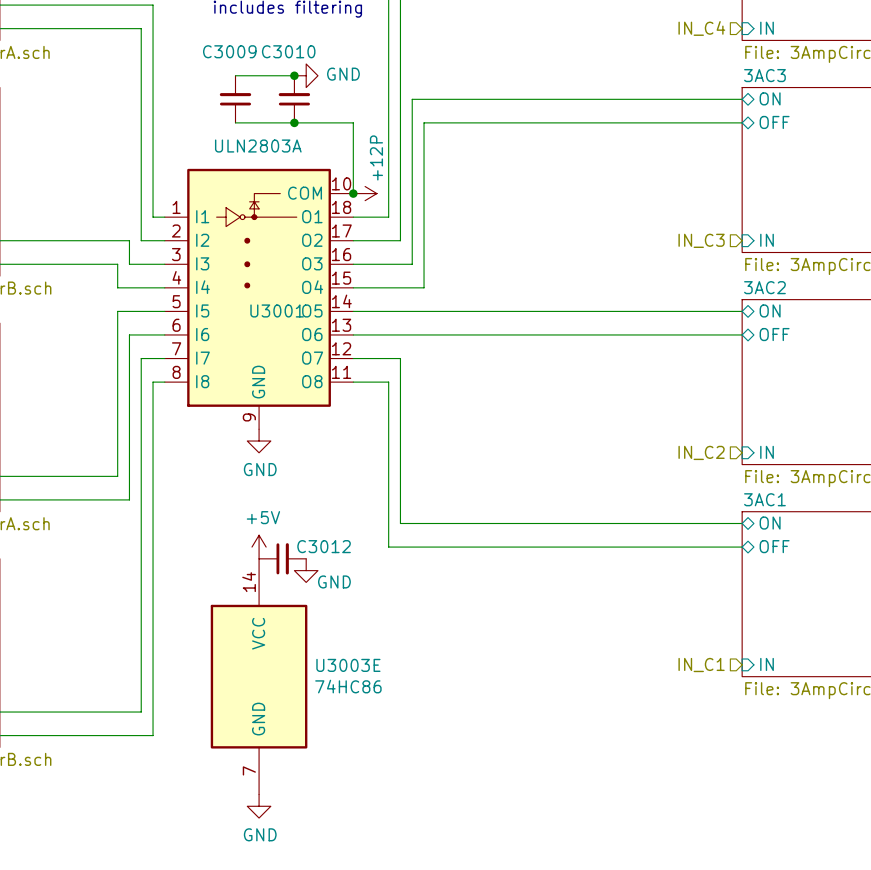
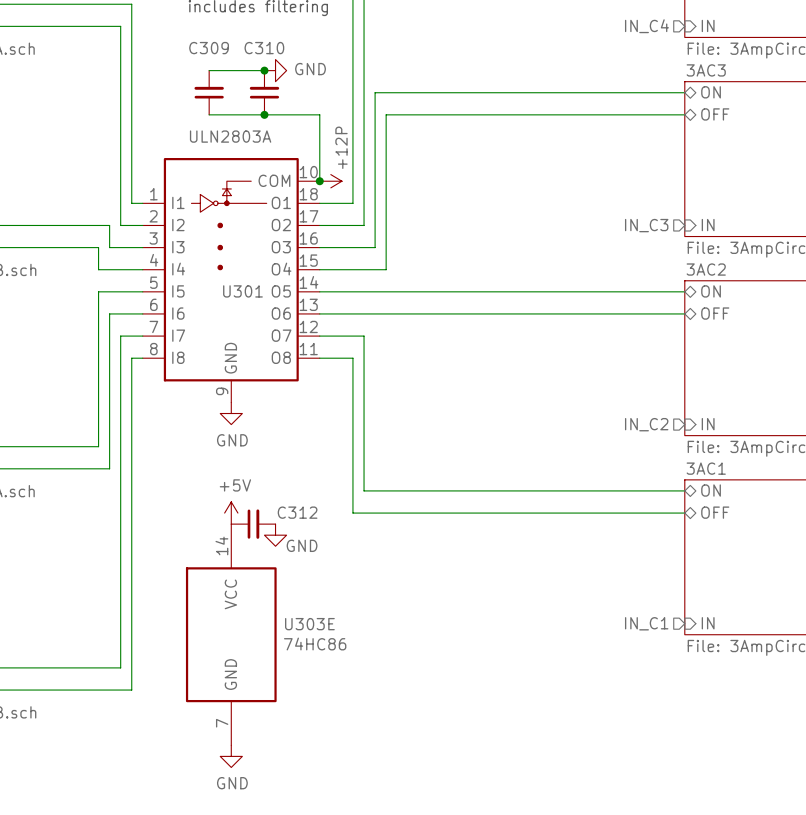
C3009 name: C3009 (229, 51) -> C309 (209, 48)
C3010 name: C3010 (288, 51) -> C310 (264, 48)
U3001 name: U3001 (277, 310) -> U301 (242, 291)
C3012 name: C3012 (324, 546) -> C312 (297, 512)
U3003E name: U3003E (348, 665) -> U303E (309, 624)

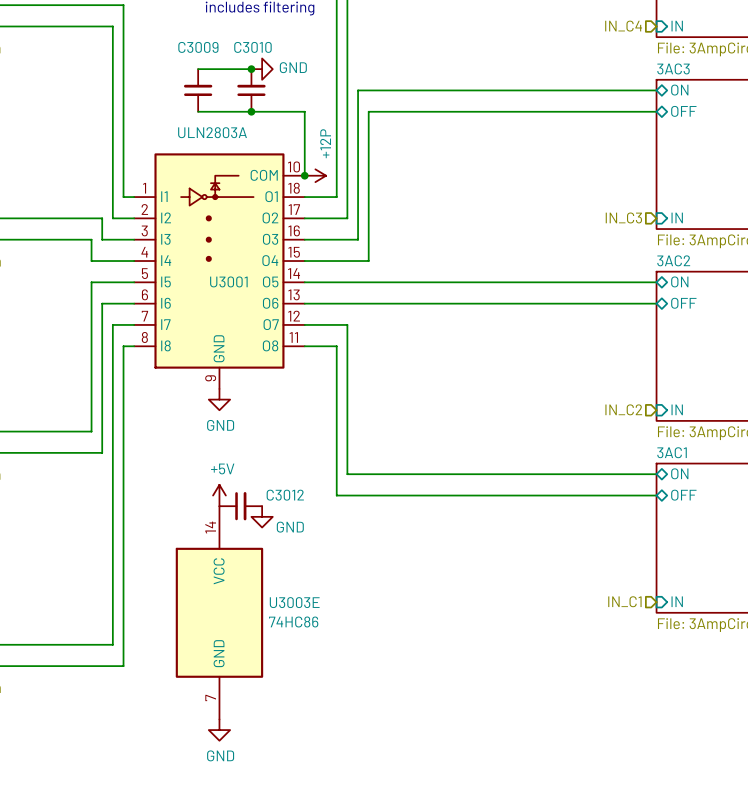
C309 name: C309 (209, 48) -> C3009 (198, 47)
C310 name: C310 (264, 48) -> C3010 (252, 47)
U301 name: U301 (242, 291) -> U3001 (228, 281)
C312 name: C312 (297, 512) -> C3012 (285, 495)
U303E name: U303E (309, 624) -> U3003E (294, 602)

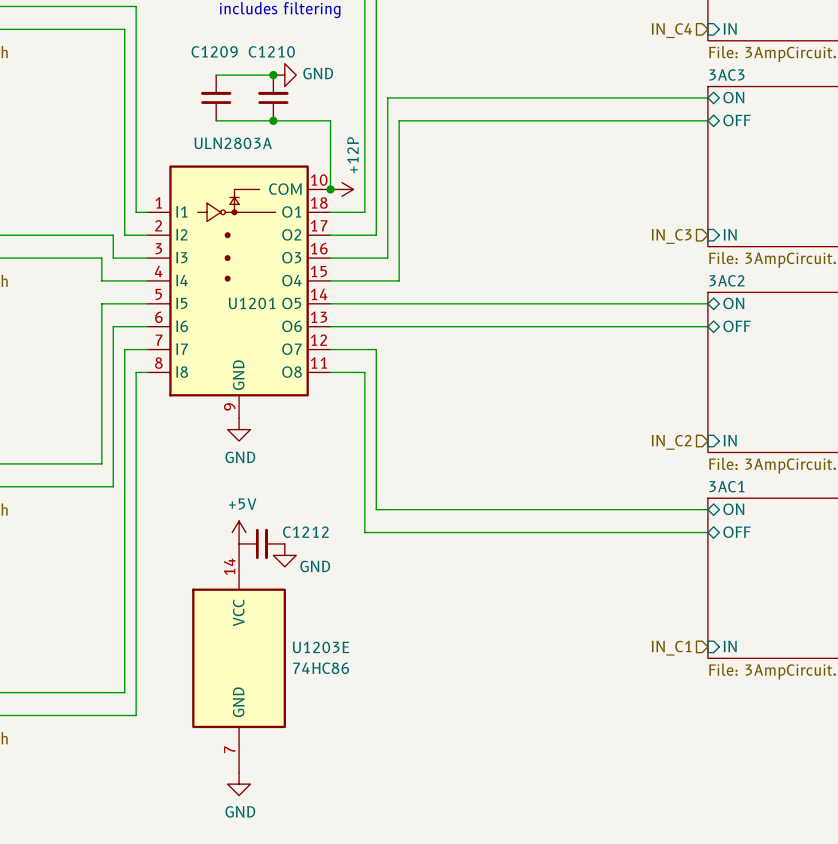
C3009 name: C3009 (198, 47) -> C1209 (214, 51)
C3010 name: C3010 (252, 47) -> C1210 (271, 51)
U3001 name: U3001 (228, 281) -> U1201 (252, 303)
C3012 name: C3012 (285, 495) -> C1212 (305, 532)
U3003E name: U3003E (294, 602) -> U1203E (320, 647)

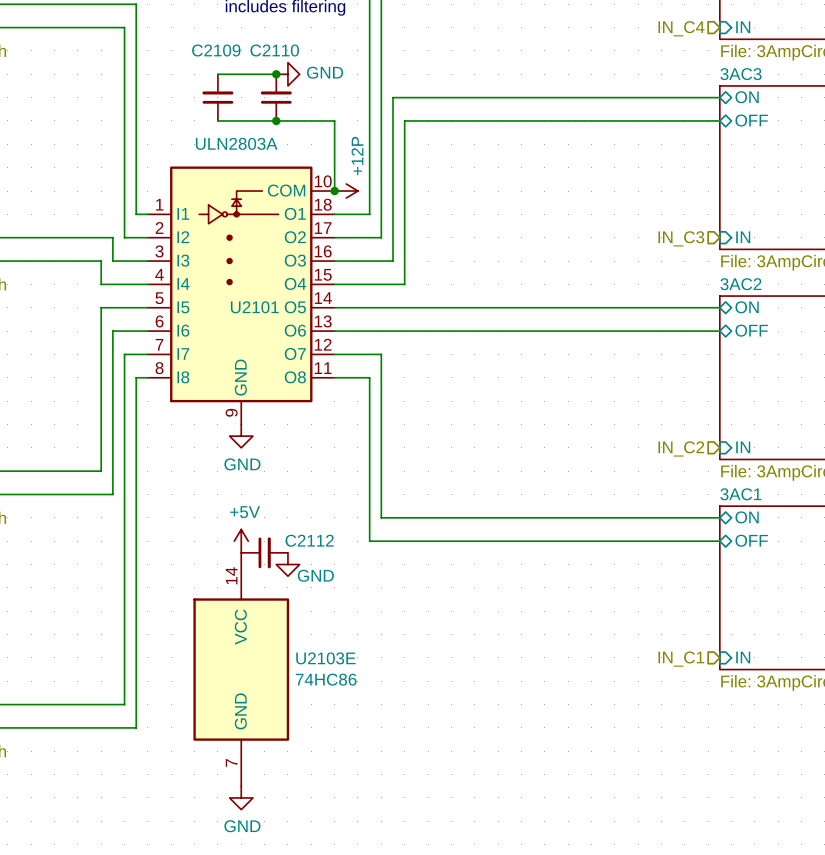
C1209 name: C1209 (214, 51) -> C2109 (216, 50)
C1210 name: C1210 (271, 51) -> C2110 (274, 50)
U1201 name: U1201 (252, 303) -> U2101 (254, 307)
C1212 name: C1212 (305, 532) -> C2112 (309, 540)
U1203E name: U1203E (320, 647) -> U2103E (325, 658)

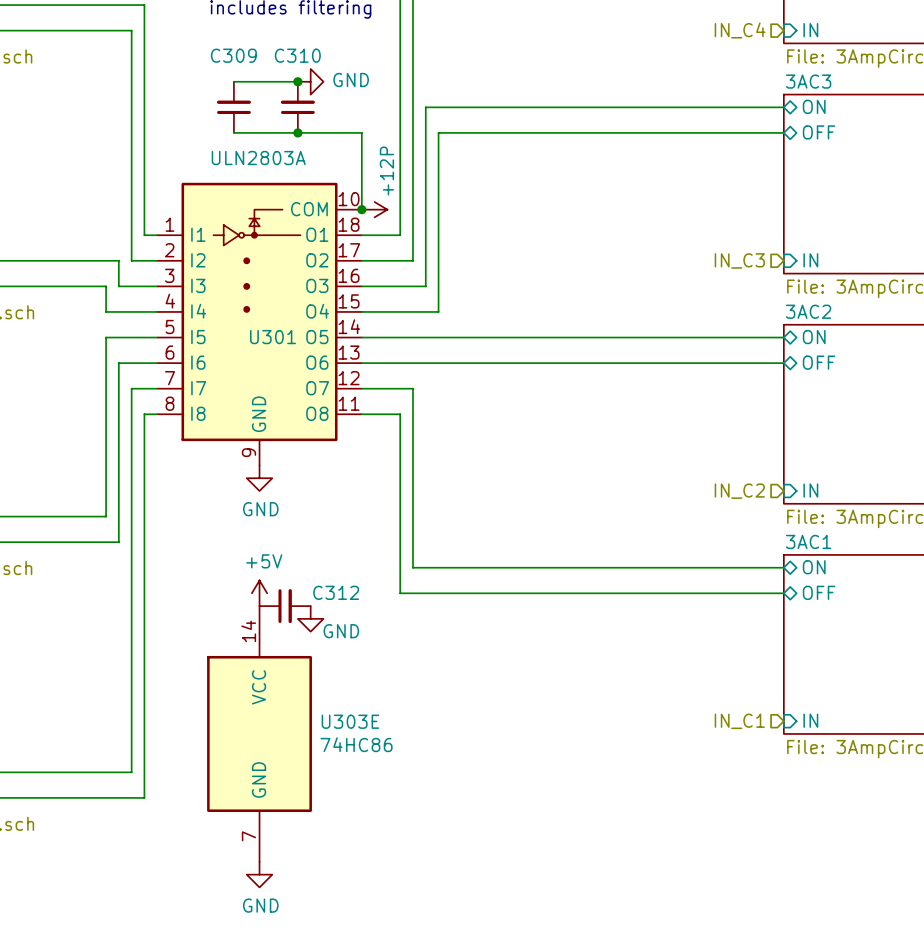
C2109 name: C2109 (216, 50) -> C309 (233, 55)
C2110 name: C2110 (274, 50) -> C310 (297, 55)
U2101 name: U2101 (254, 307) -> U301 (273, 337)
C2112 name: C2112 (309, 540) -> C312 (336, 592)
U2103E name: U2103E (325, 658) -> U303E (350, 721)

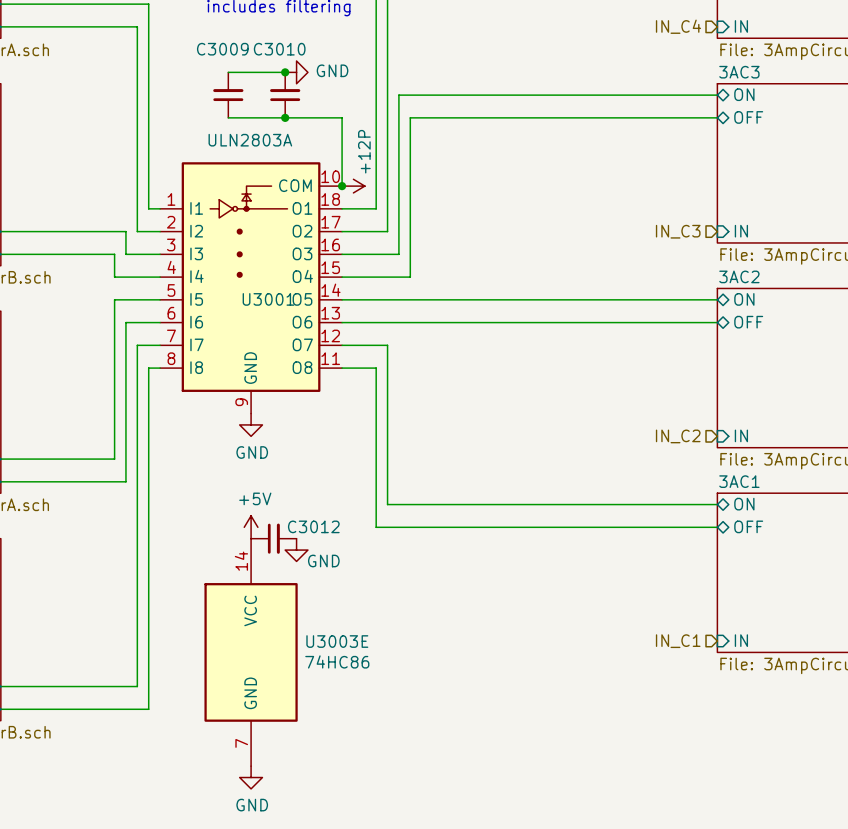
C309 name: C309 (233, 55) -> C3009 (222, 49)
C310 name: C310 (297, 55) -> C3010 (279, 49)
U301 name: U301 (273, 337) -> U3001 (268, 299)
C312 name: C312 (336, 592) -> C3012 (313, 526)
U303E name: U303E (350, 721) -> U3003E (337, 641)

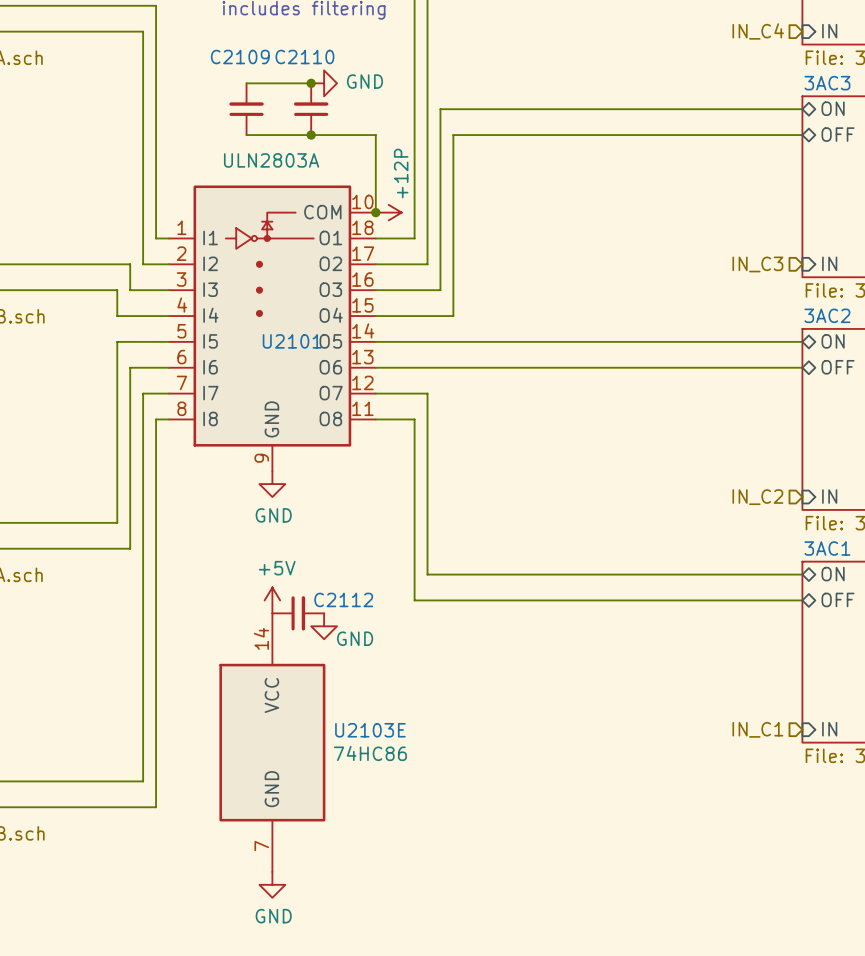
C3009 name: C3009 (222, 49) -> C2109 (240, 57)
C3010 name: C3010 (279, 49) -> C2110 (304, 57)
U3001 name: U3001 (268, 299) -> U2101 (292, 341)
C3012 name: C3012 (313, 526) -> C2112 (343, 599)
U3003E name: U3003E (337, 641) -> U2103E (370, 730)

